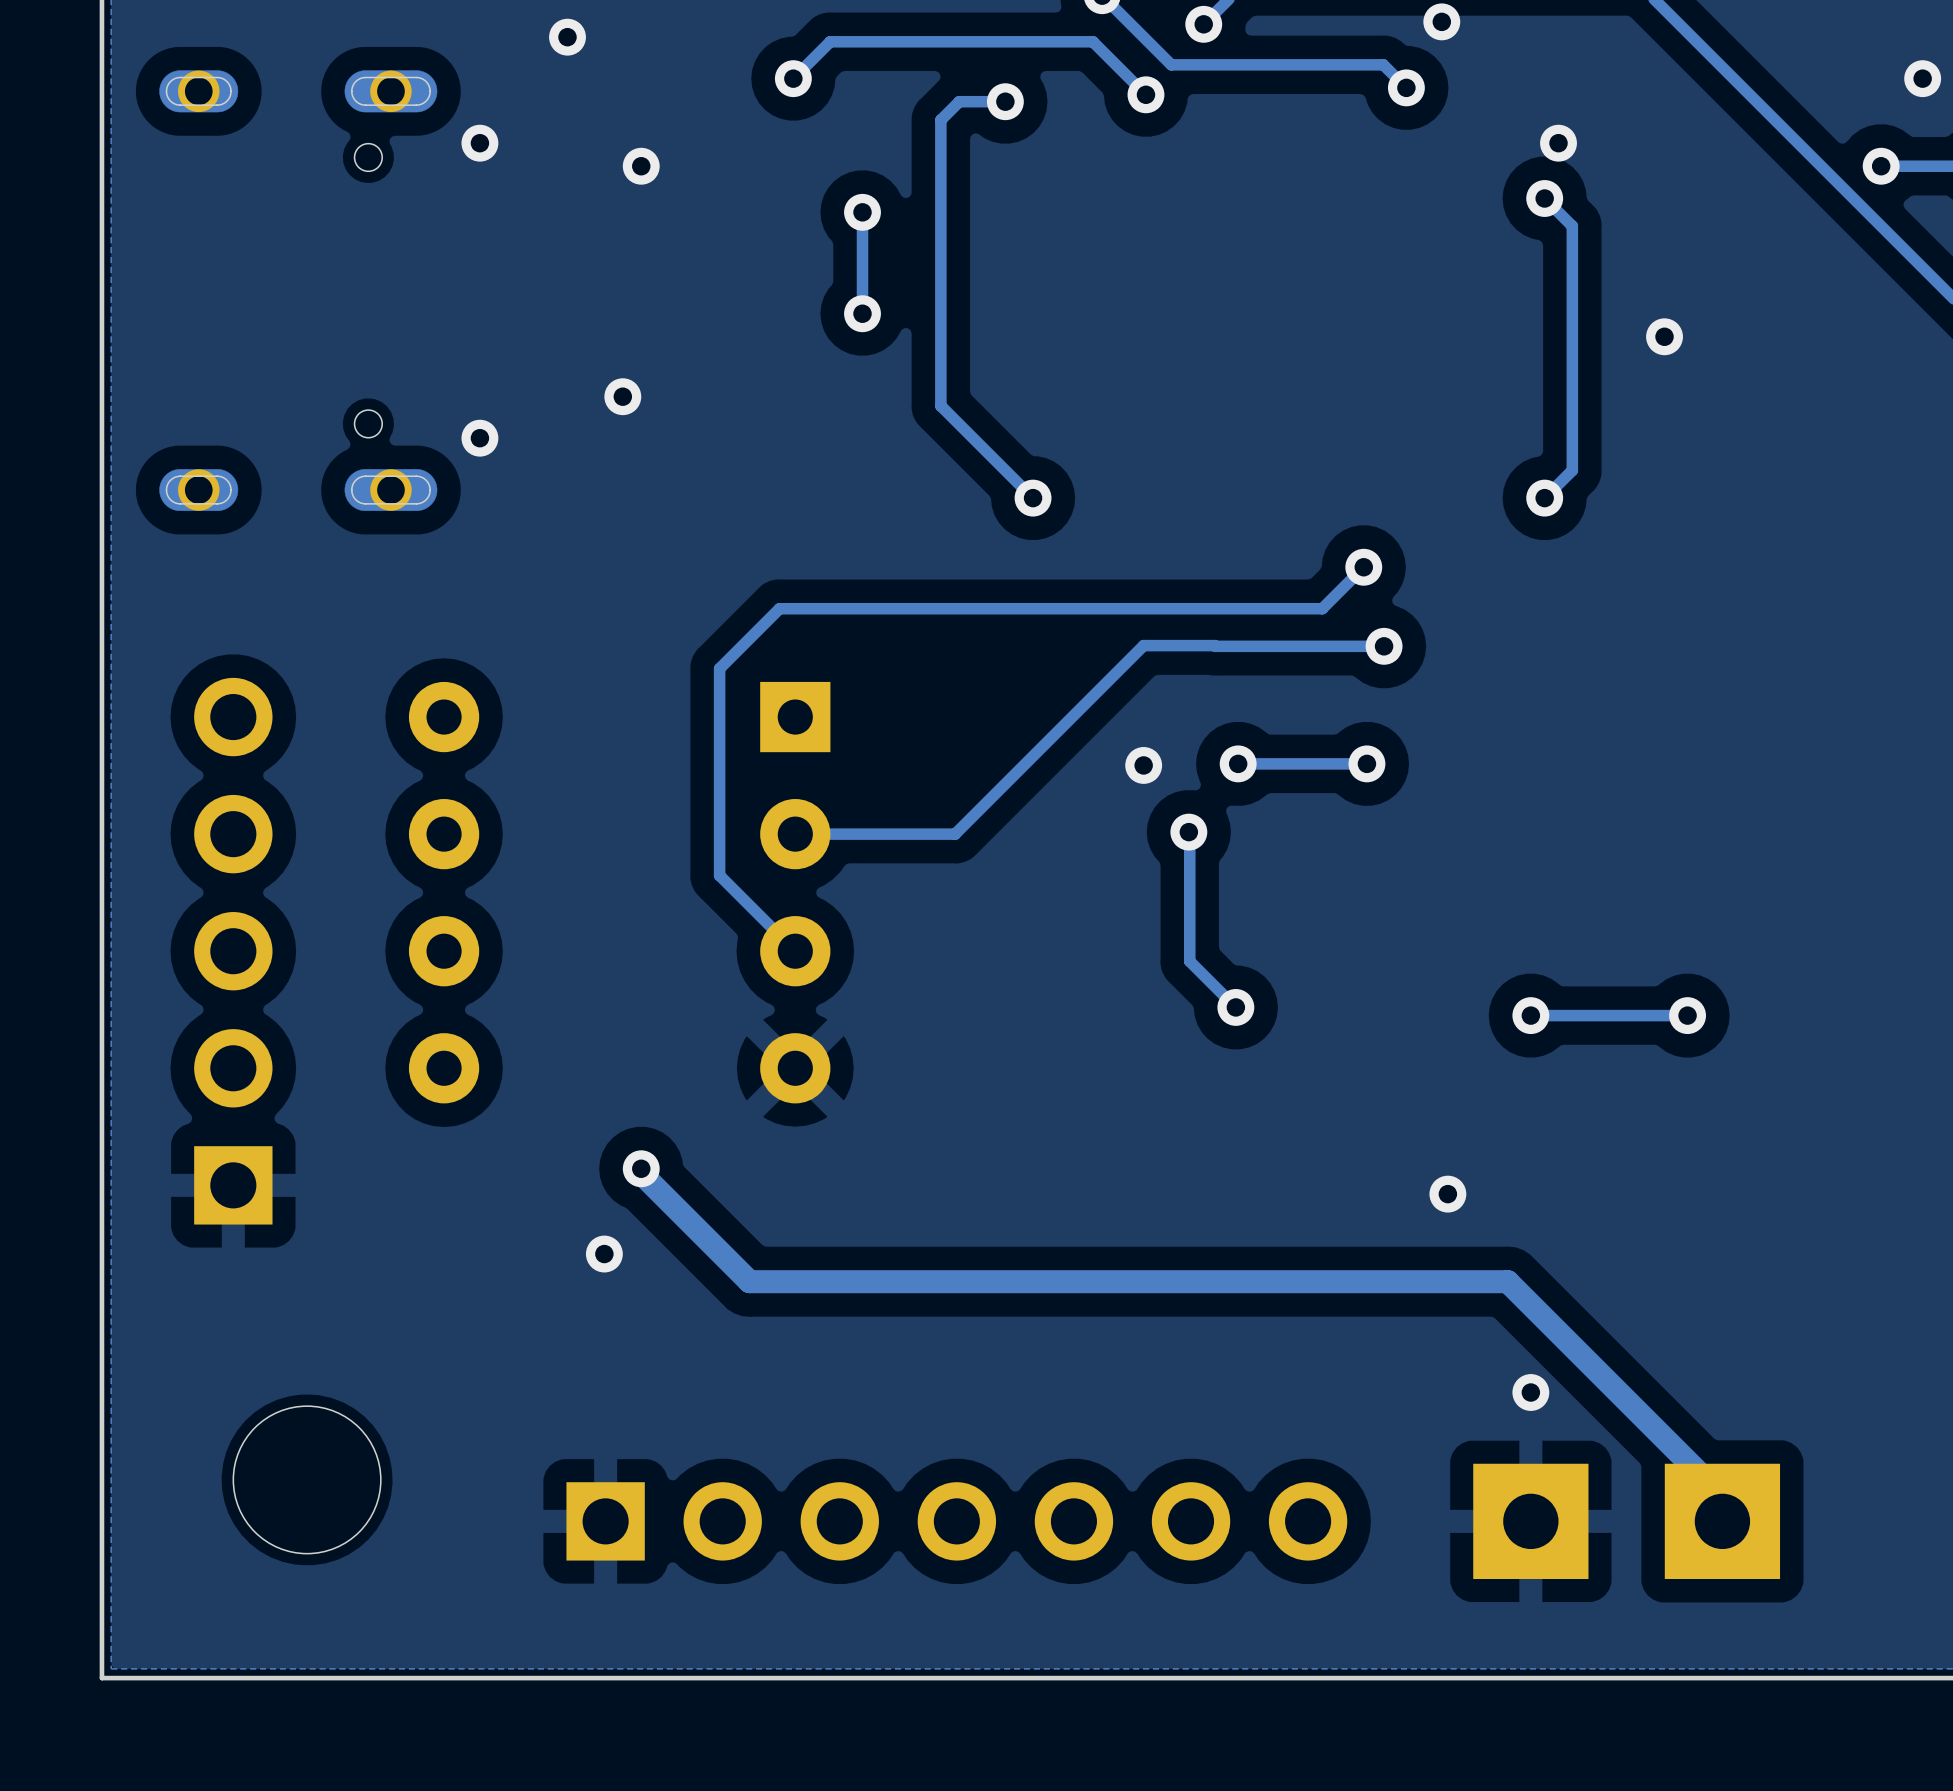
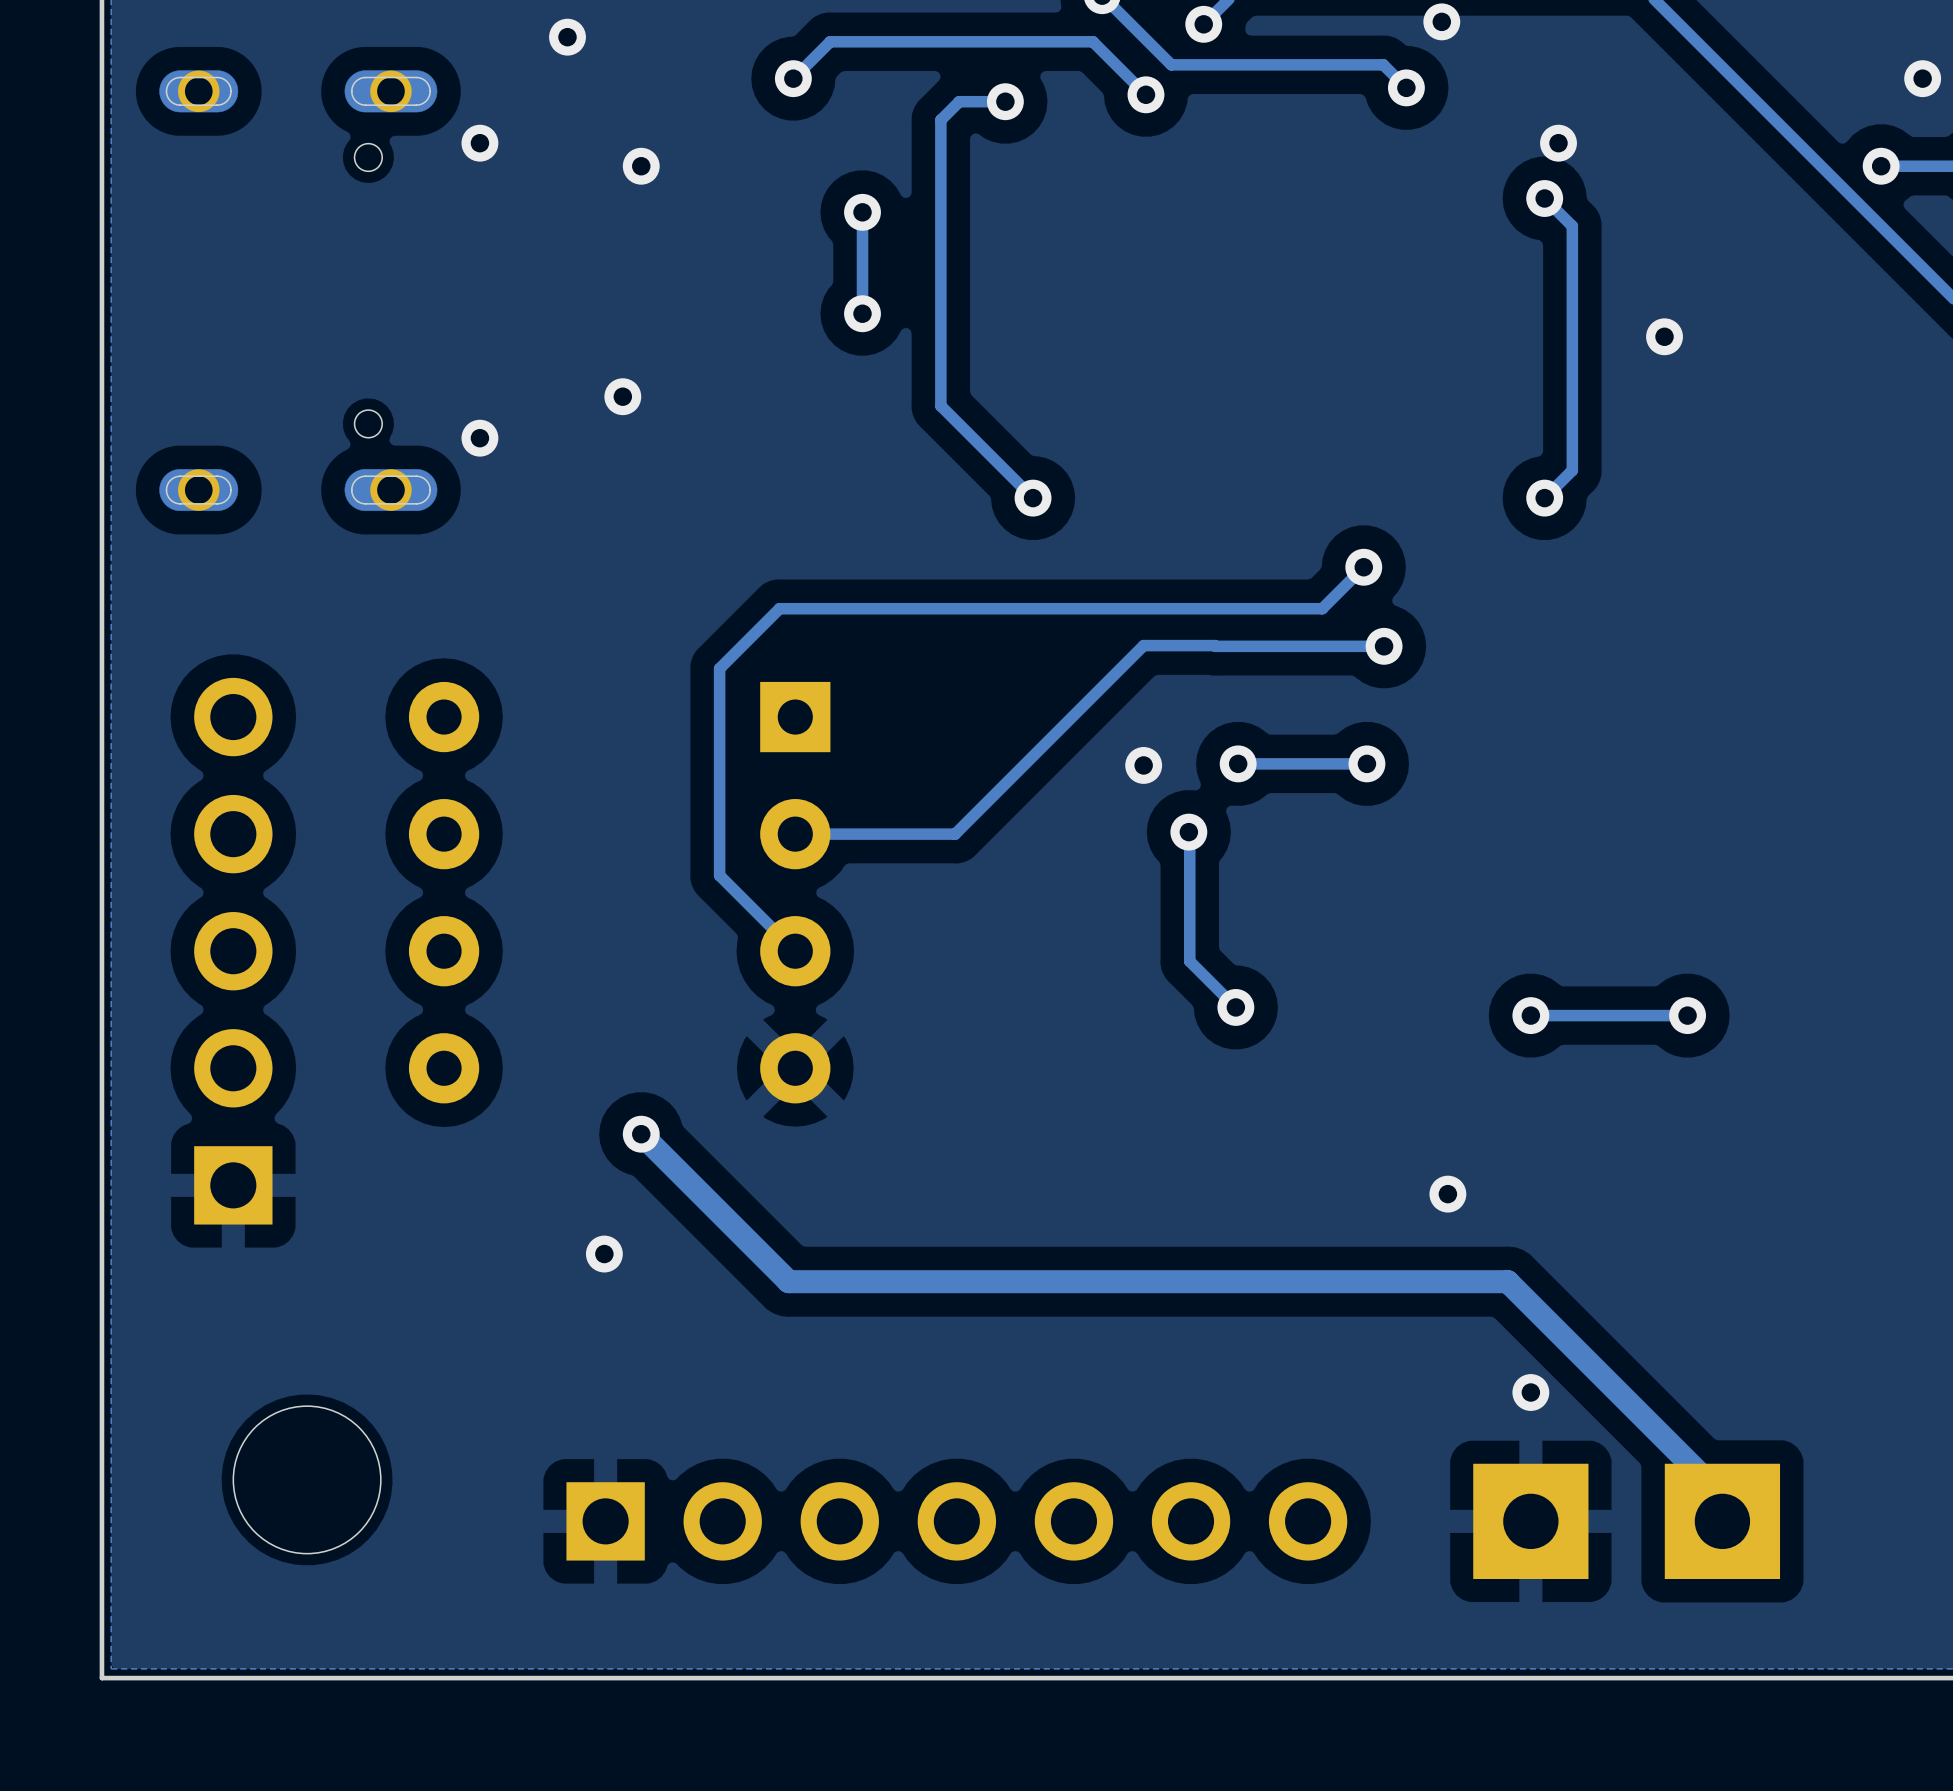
track: (641, 1168) (641, 1173) (749, 1281) (788, 1281) -> (641, 1134) (788, 1281)
via position: (641, 1168) -> (641, 1134)

